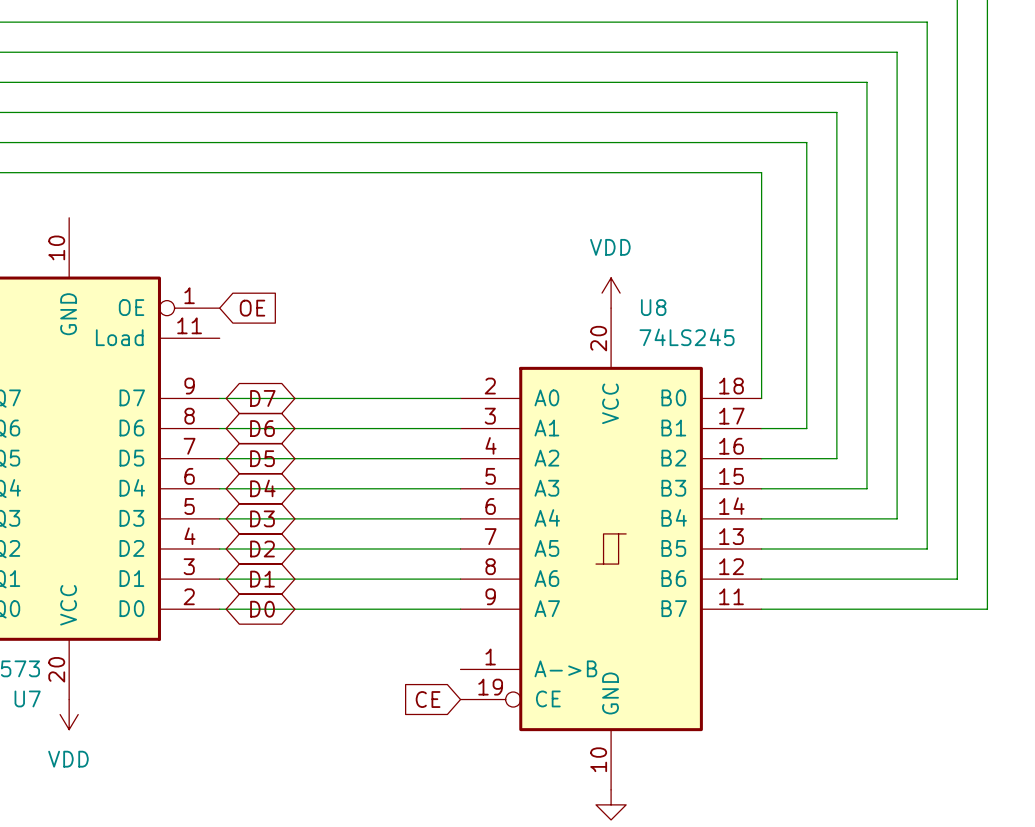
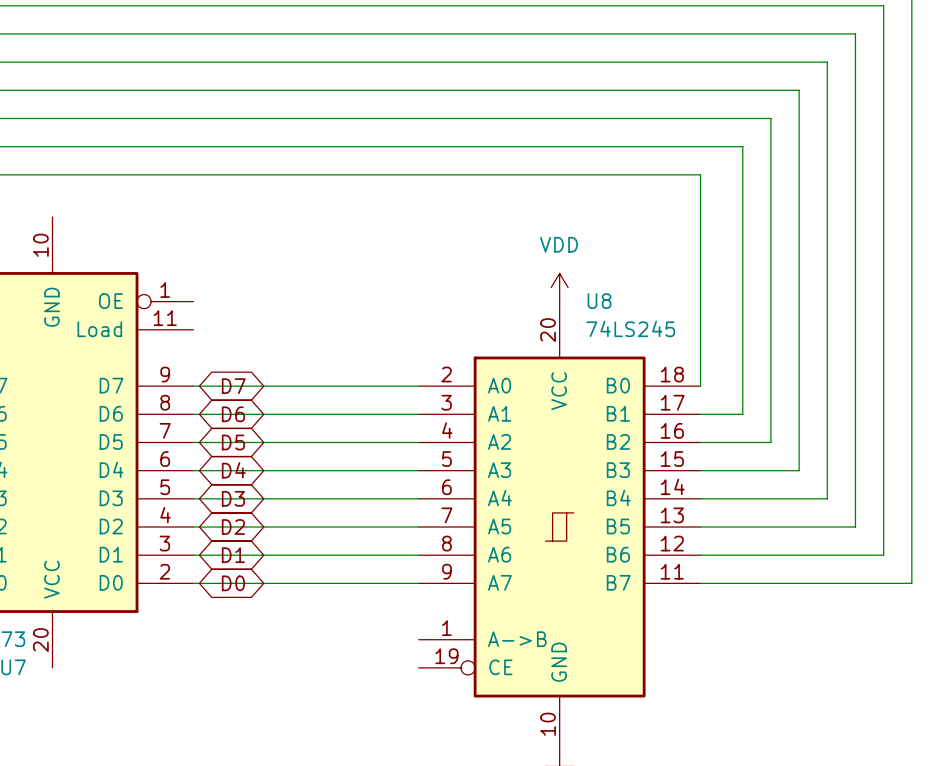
global label: OE (252, 308) -> none
global label: CE (428, 699) -> none
power symbol: VDD (69, 714) -> none

